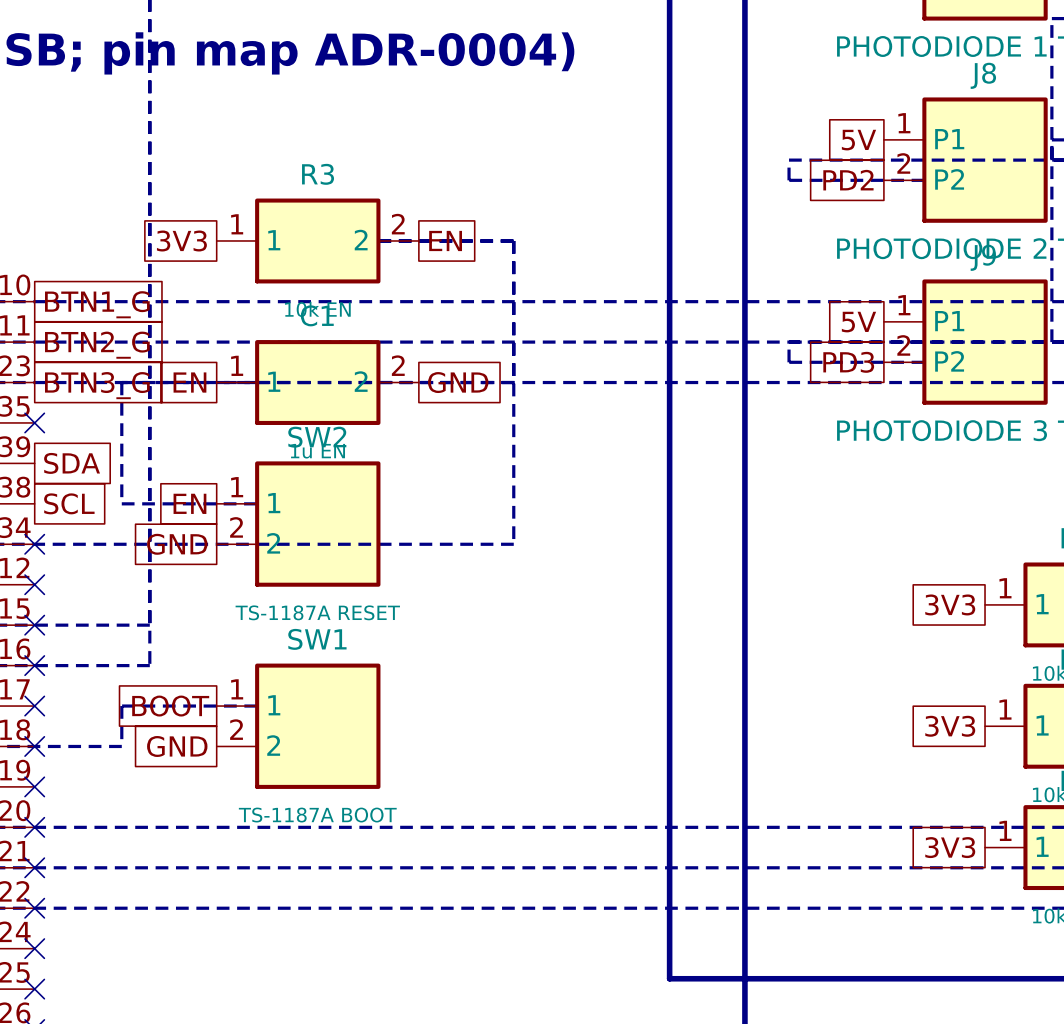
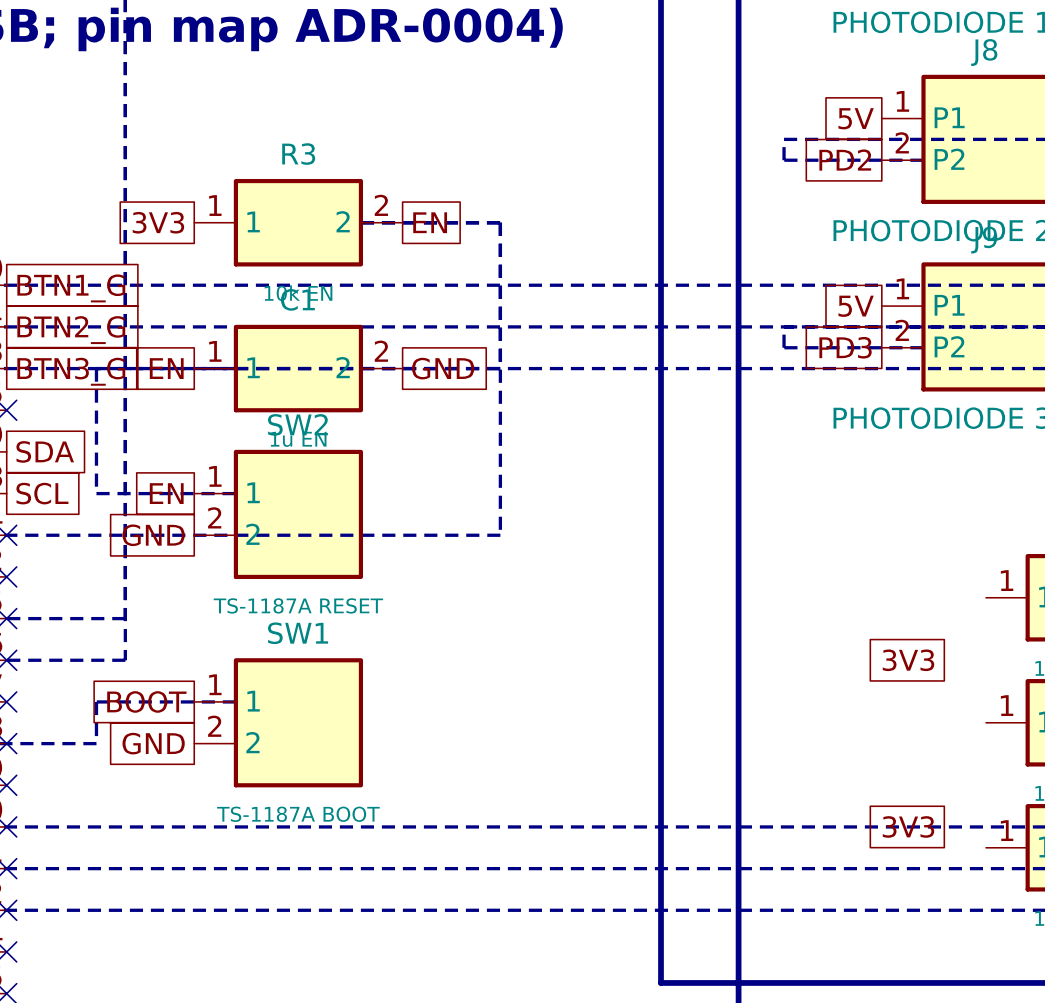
global label: 3V3 (950, 604) -> none
global label: none -> 3V3 (908, 660)
global label: 3V3 (950, 726) -> none
global label position: 3V3 (950, 847) -> 3V3 (908, 826)

